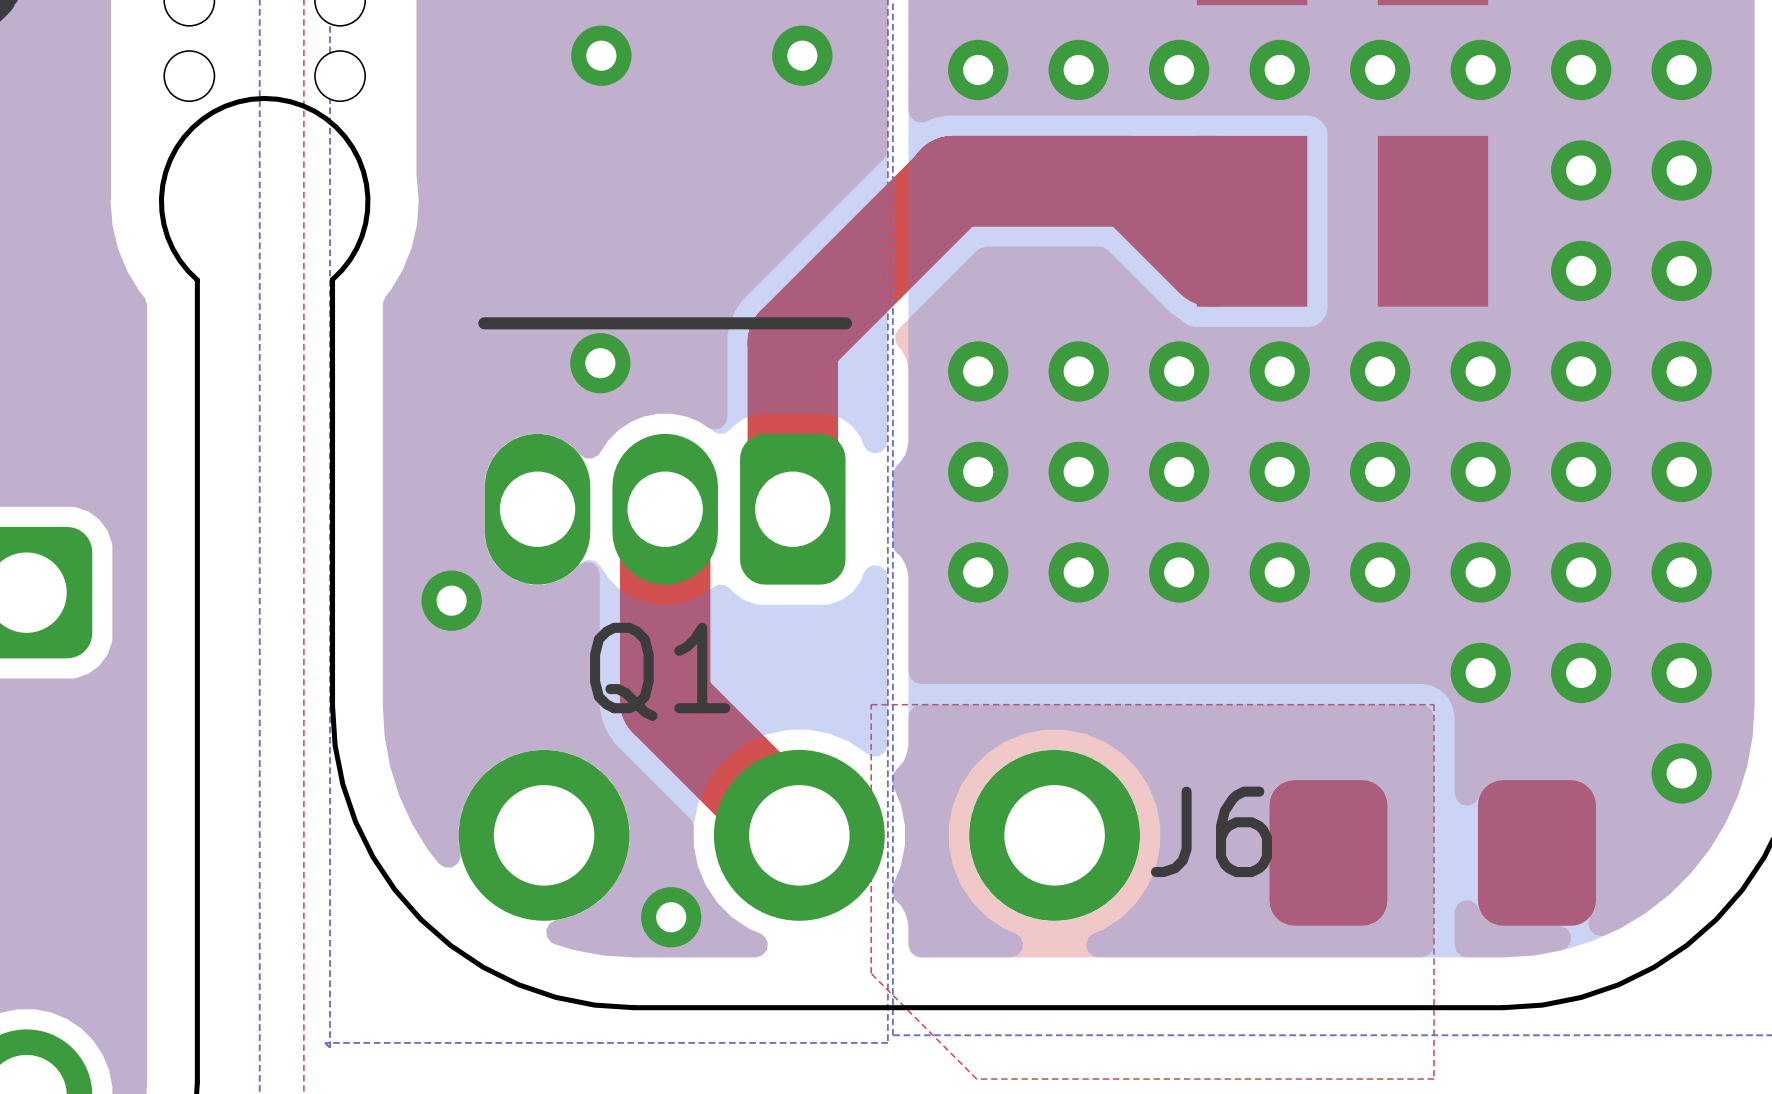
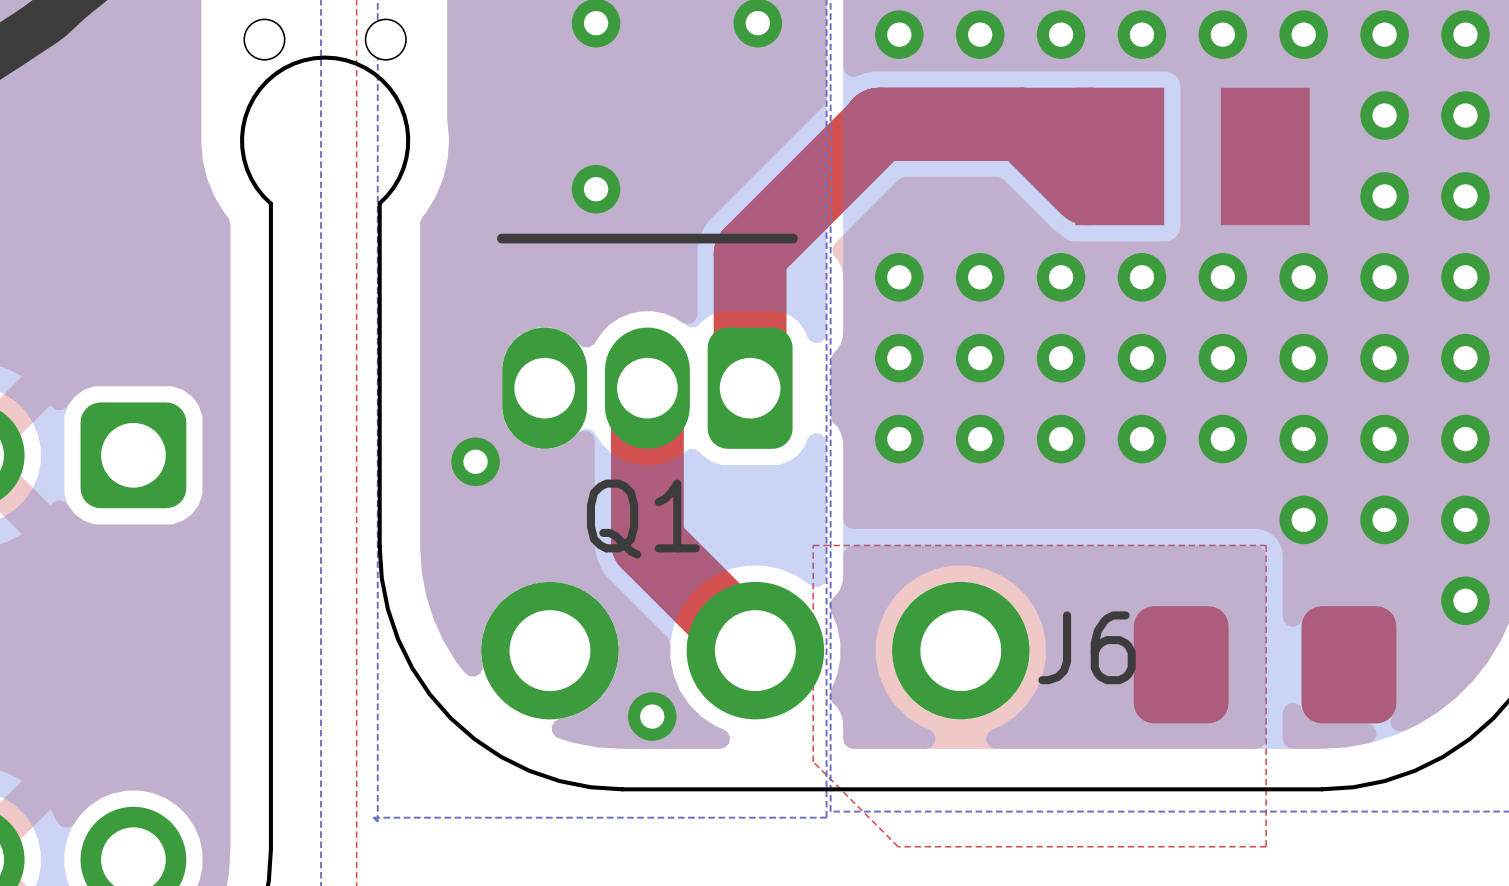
via position: (600, 363) -> (596, 189)

